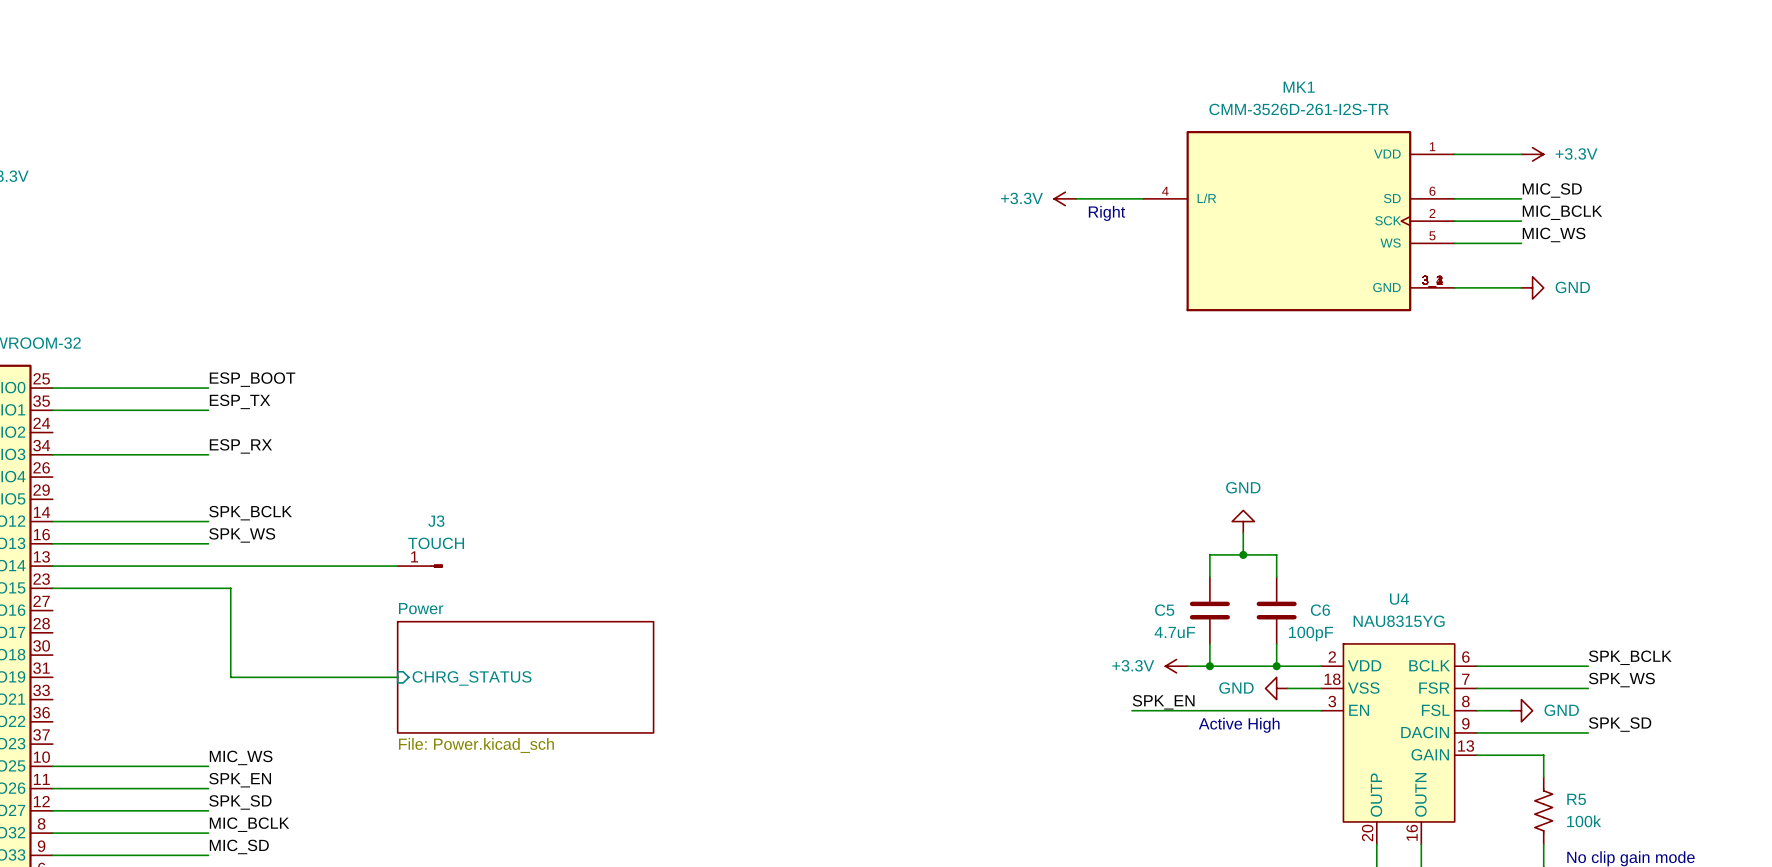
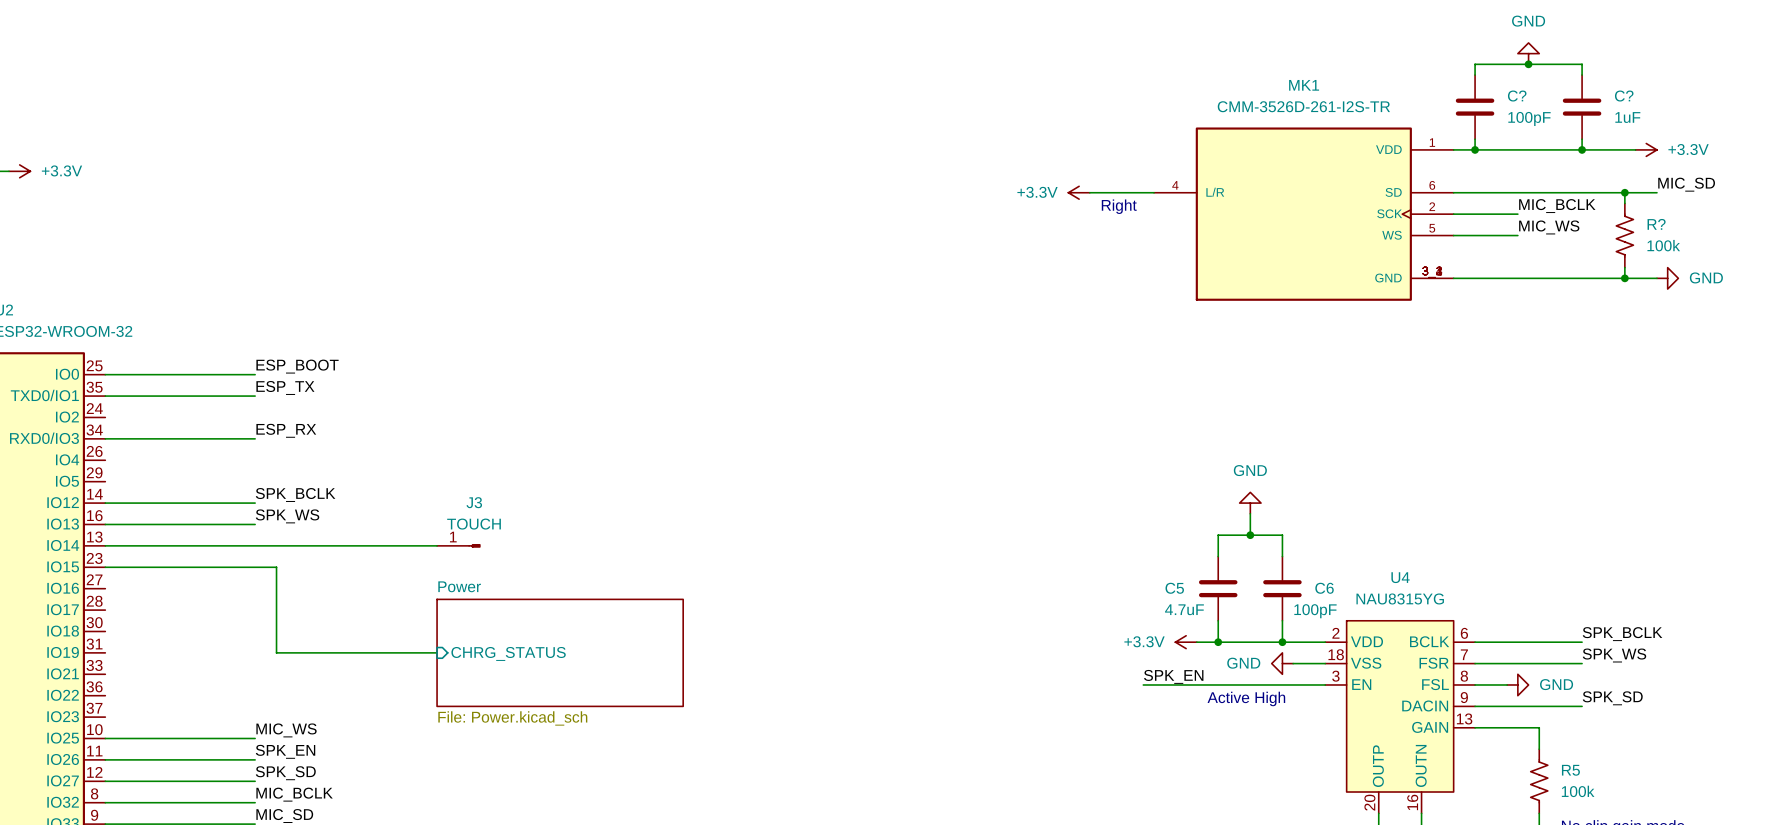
power symbol: none -> GND (1528, 53)
junction: none -> (1528, 64)
wire: none -> (1475, 75) (1475, 64) (1582, 64) (1582, 75)
C?: none -> 100pF (1475, 107)
C?: none -> 1uF (1582, 107)
wire: none -> (1475, 139) (1475, 149)
wire: none -> (1582, 139) (1582, 149)
junction: none -> (1475, 149)
wire: none -> (1517, 149) (1635, 149)
power symbol position: +3.3V (1532, 154) -> +3.3V (1646, 149)
junction: none -> (1582, 149)
label position: MIC_SD (1552, 190) -> MIC_SD (1686, 184)
wire: none -> (1517, 192) (1656, 192)
wire: none -> (1624, 192) (1624, 203)
junction: none -> (1624, 192)
R?: none -> 100k (1624, 235)
wire: none -> (1624, 267) (1624, 278)
wire: none -> (1517, 278) (1656, 278)
power symbol: GND (1532, 287) -> none
junction: none -> (1624, 278)
power symbol: none -> GND (1667, 278)

